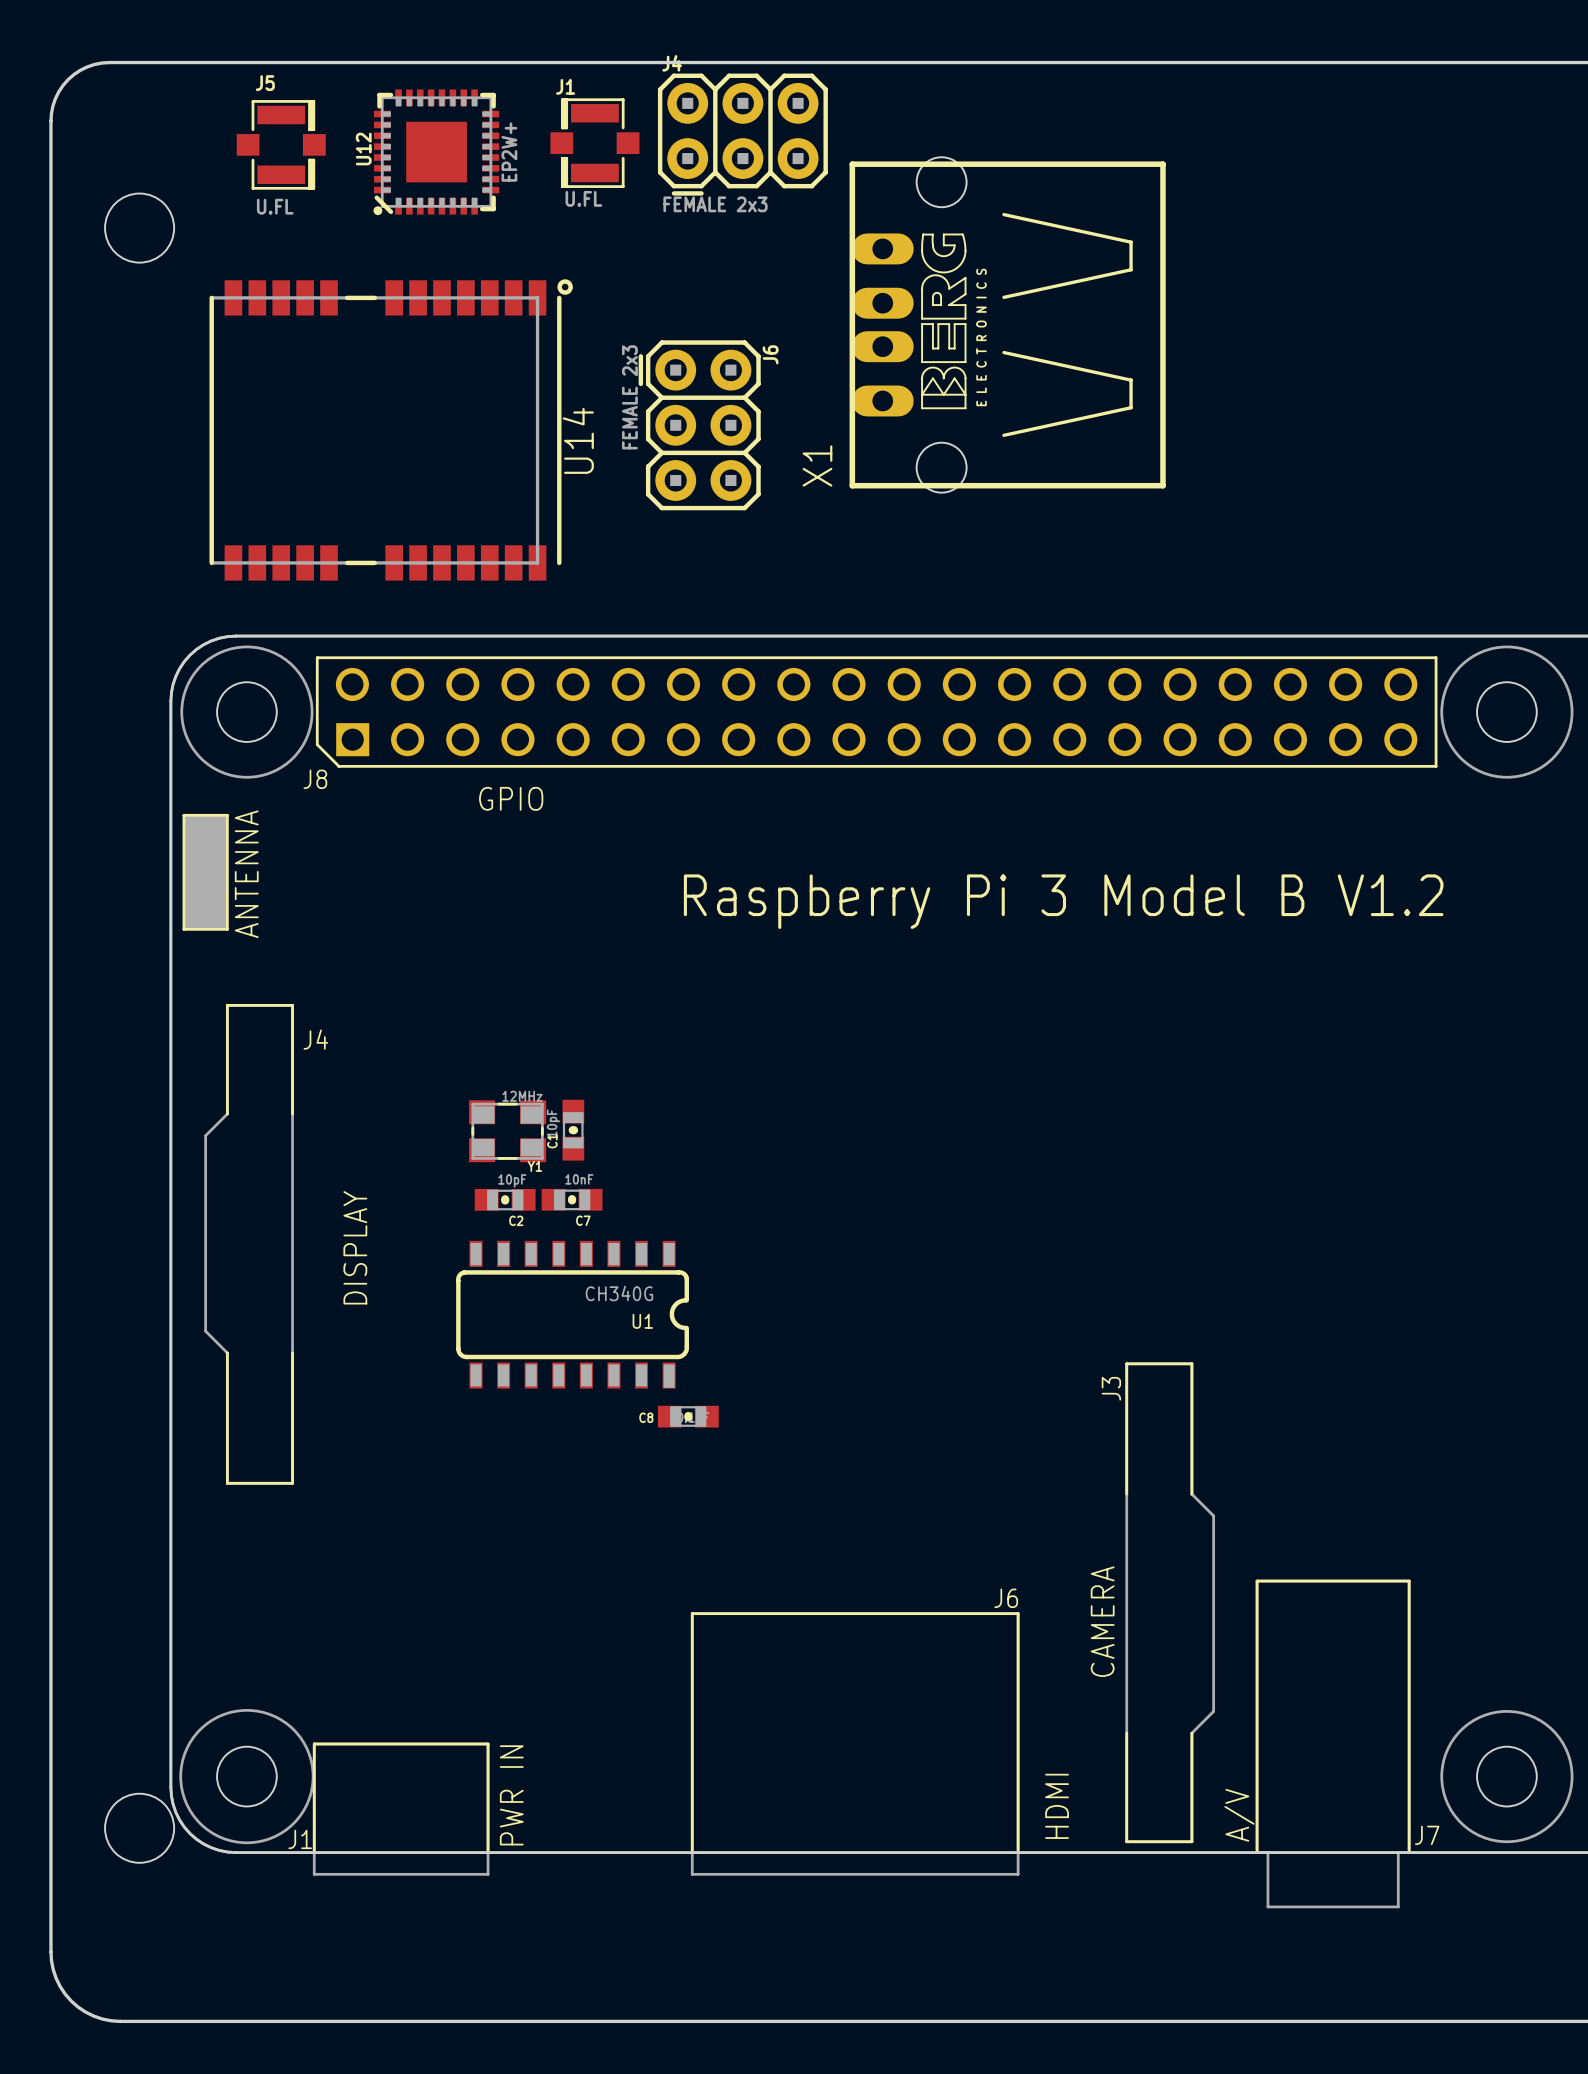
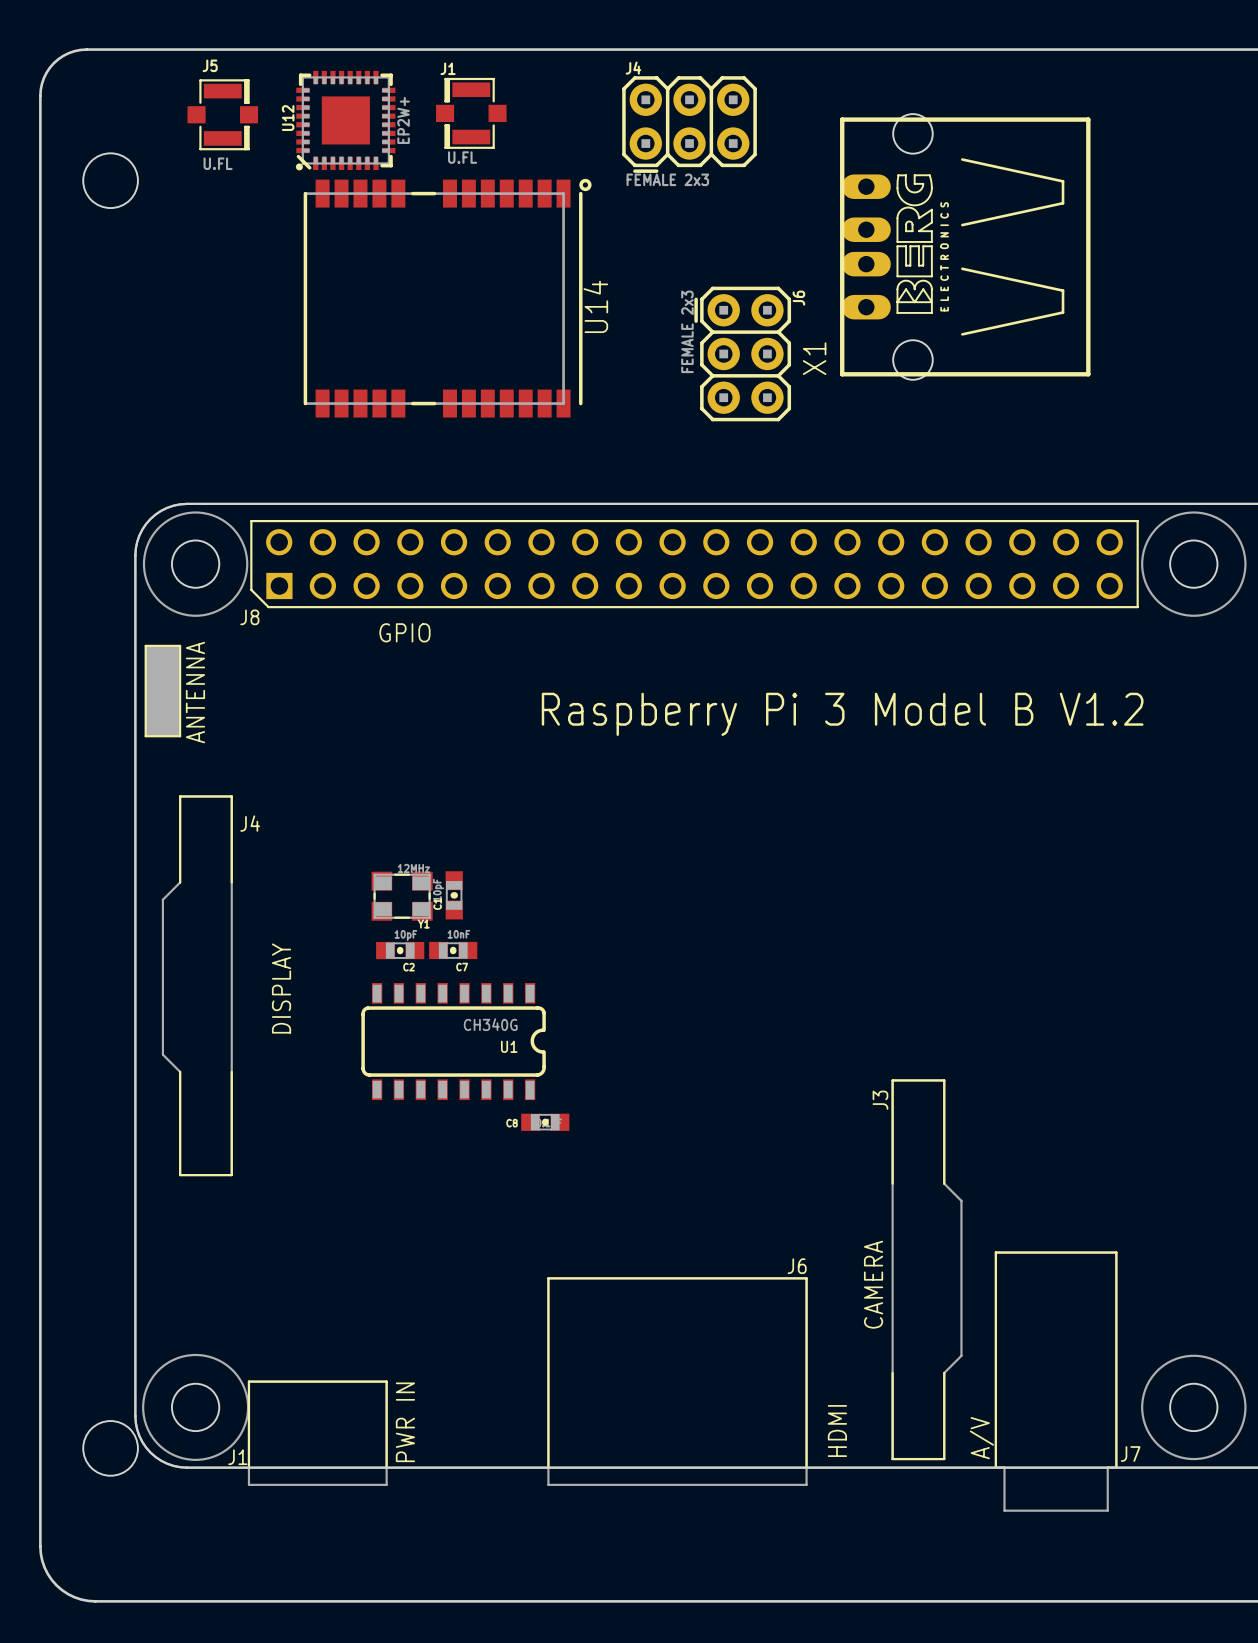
J4 position: (742, 134) -> (689, 124)
X1 position: (1007, 324) -> (965, 246)
J6 position: (699, 425) -> (742, 353)
U14 position: (391, 429) -> (447, 298)

